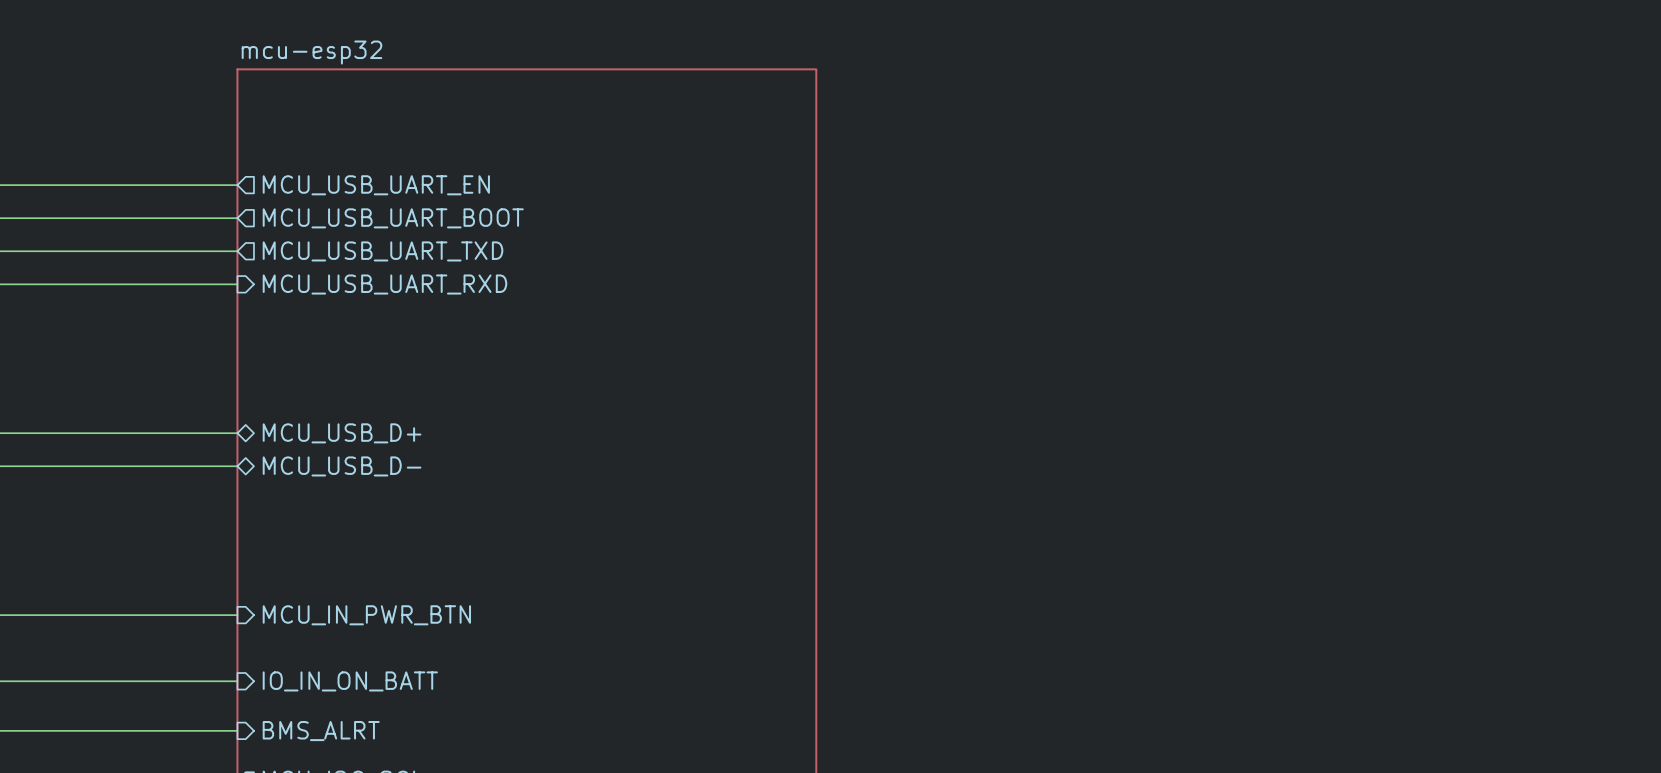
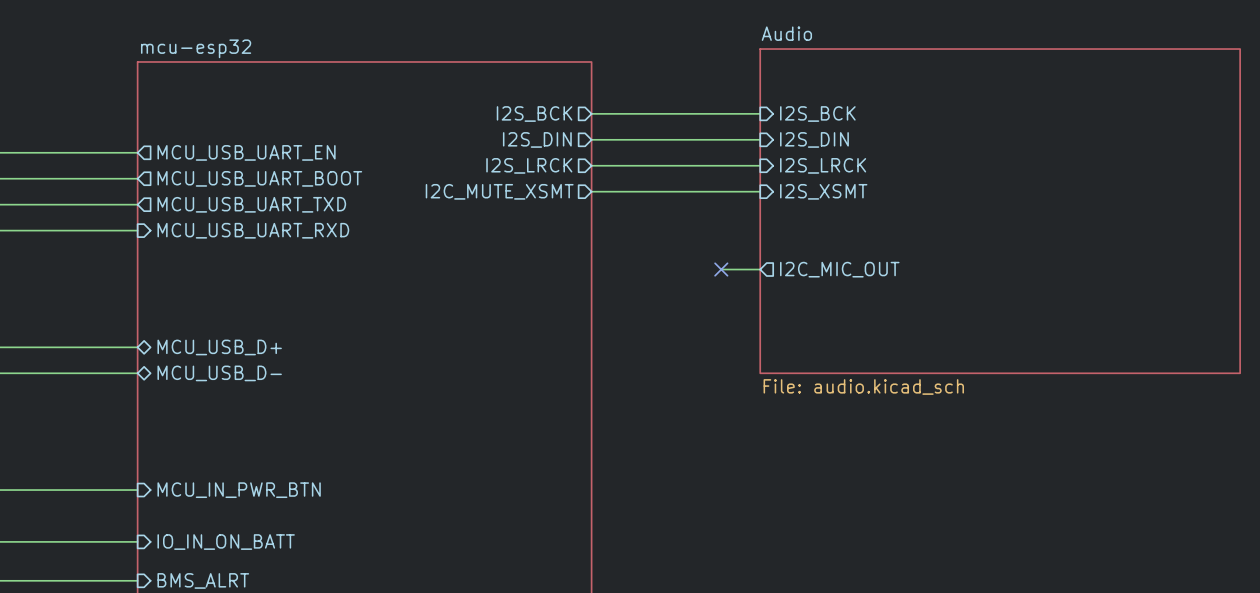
sheet pin: none -> I2S_BCK (534, 114)
wire: none -> (591, 113) (760, 113)
sheet pin: none -> I2S_BCK (817, 114)
sheet pin: none -> I2S_DIN (537, 139)
wire: none -> (591, 139) (760, 139)
sheet pin: none -> I2S_DIN (814, 139)
sheet pin: none -> I2S_LRCK (529, 165)
wire: none -> (591, 165) (760, 165)
sheet pin: none -> I2S_LRCK (823, 165)
sheet pin: none -> I2C_MUTE_XSMT (499, 191)
wire: none -> (591, 191) (760, 191)
sheet pin: none -> I2S_XSMT (823, 191)
sheet Audio: none -> File: audio.kicad_sch (1000, 211)
wire: none -> (721, 269) (760, 269)
no-connect mark: none -> (721, 269)
sheet pin: none -> I2C_MIC_OUT (839, 269)

